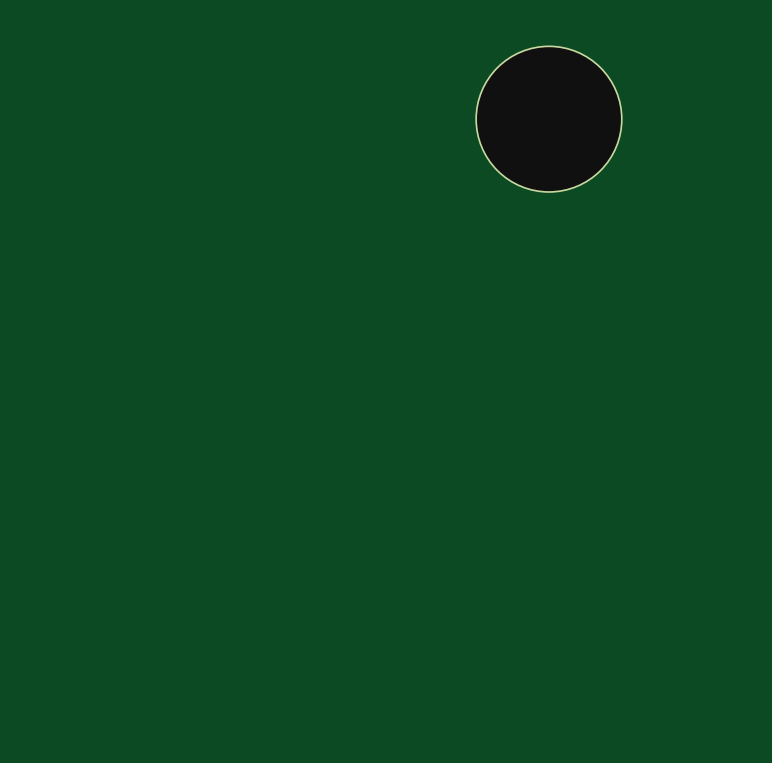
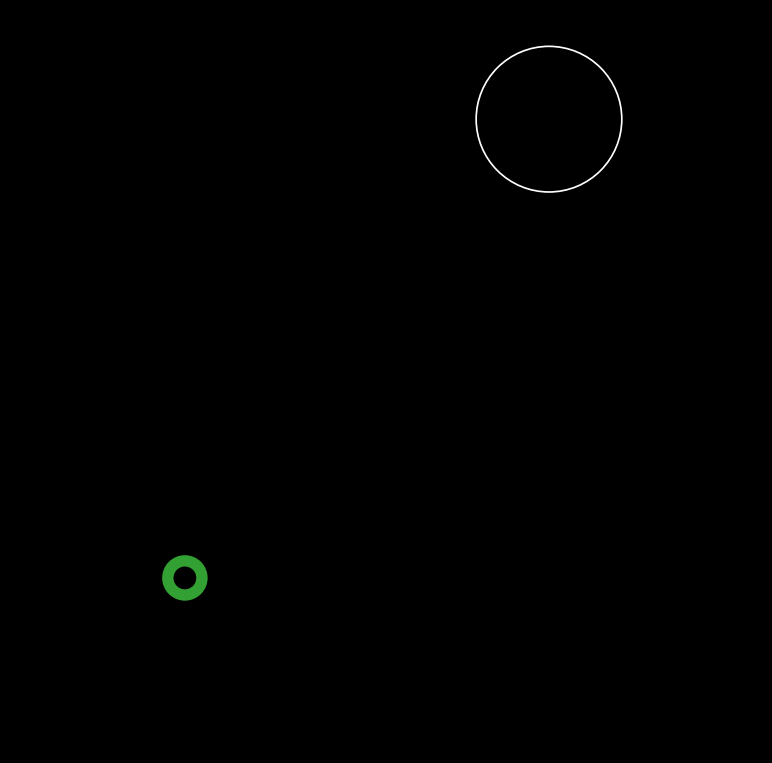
via: none -> (184, 577)

